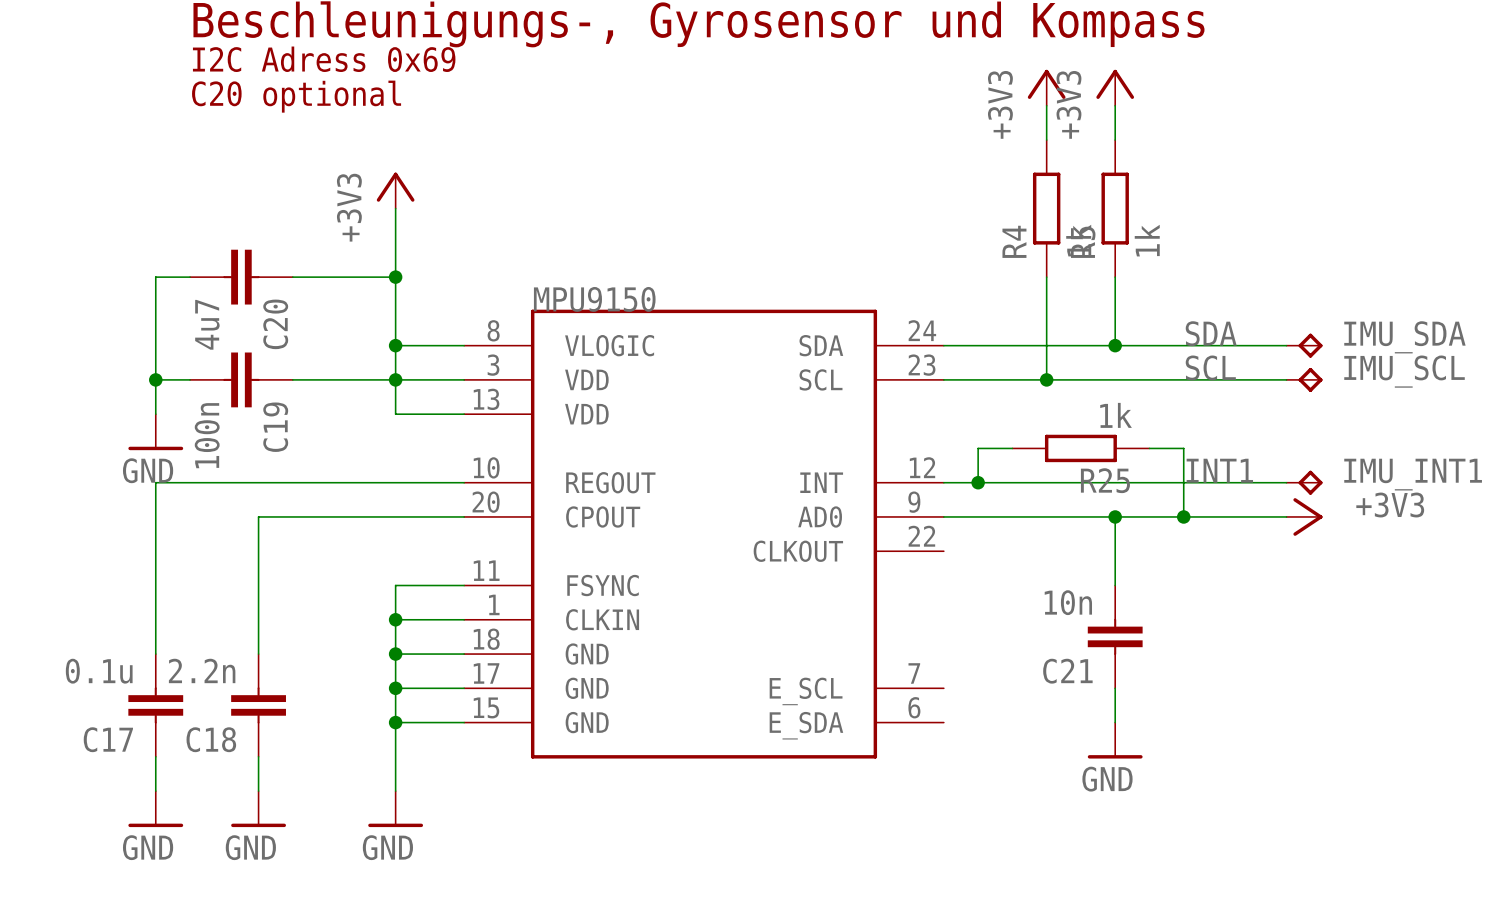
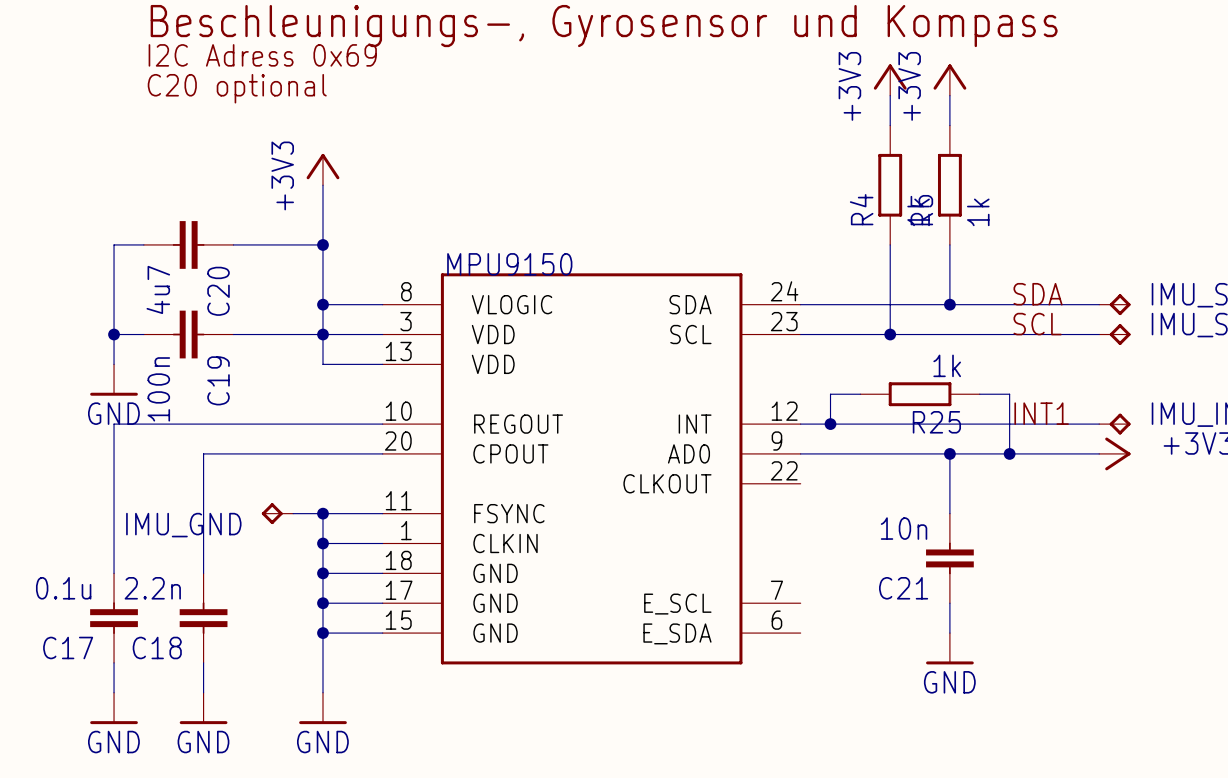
IMU_GND: none -> (277, 513)
wire: none -> (293, 513) (322, 513)
junction: none -> (322, 513)

